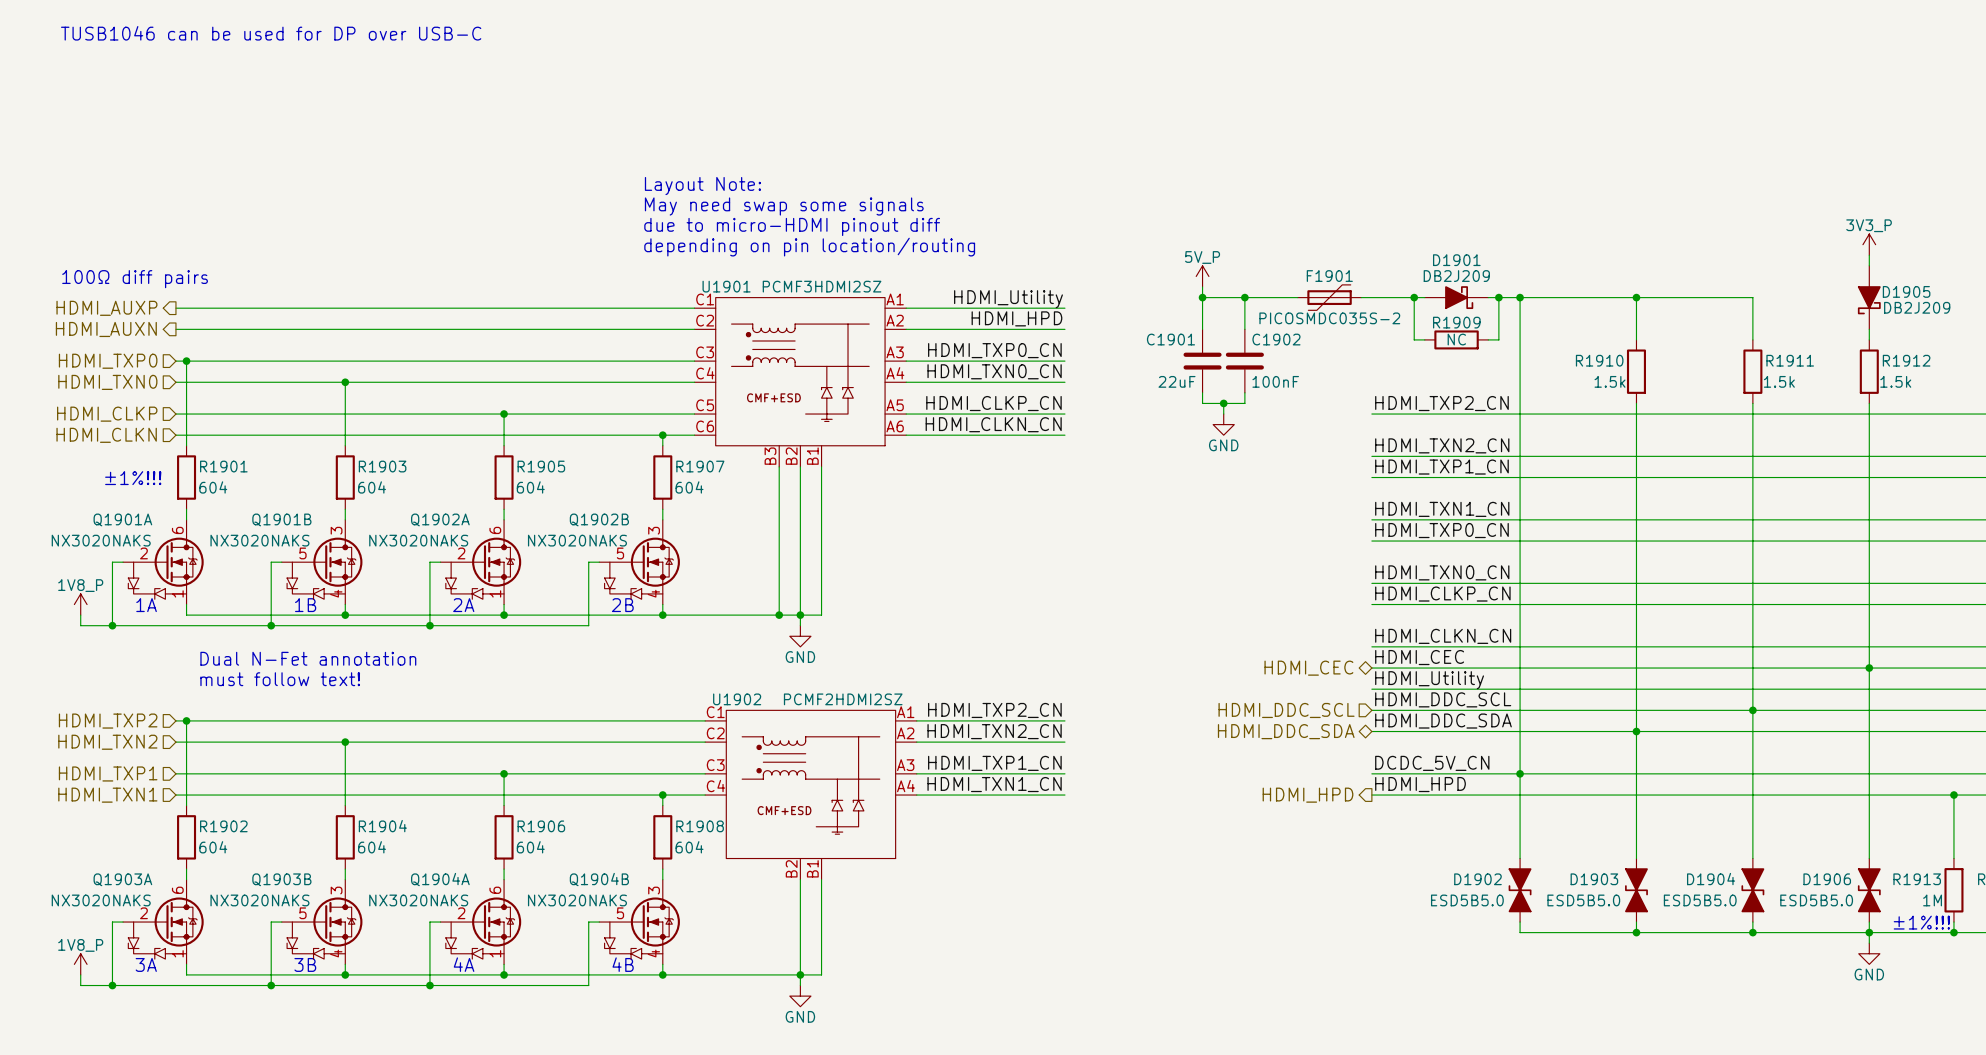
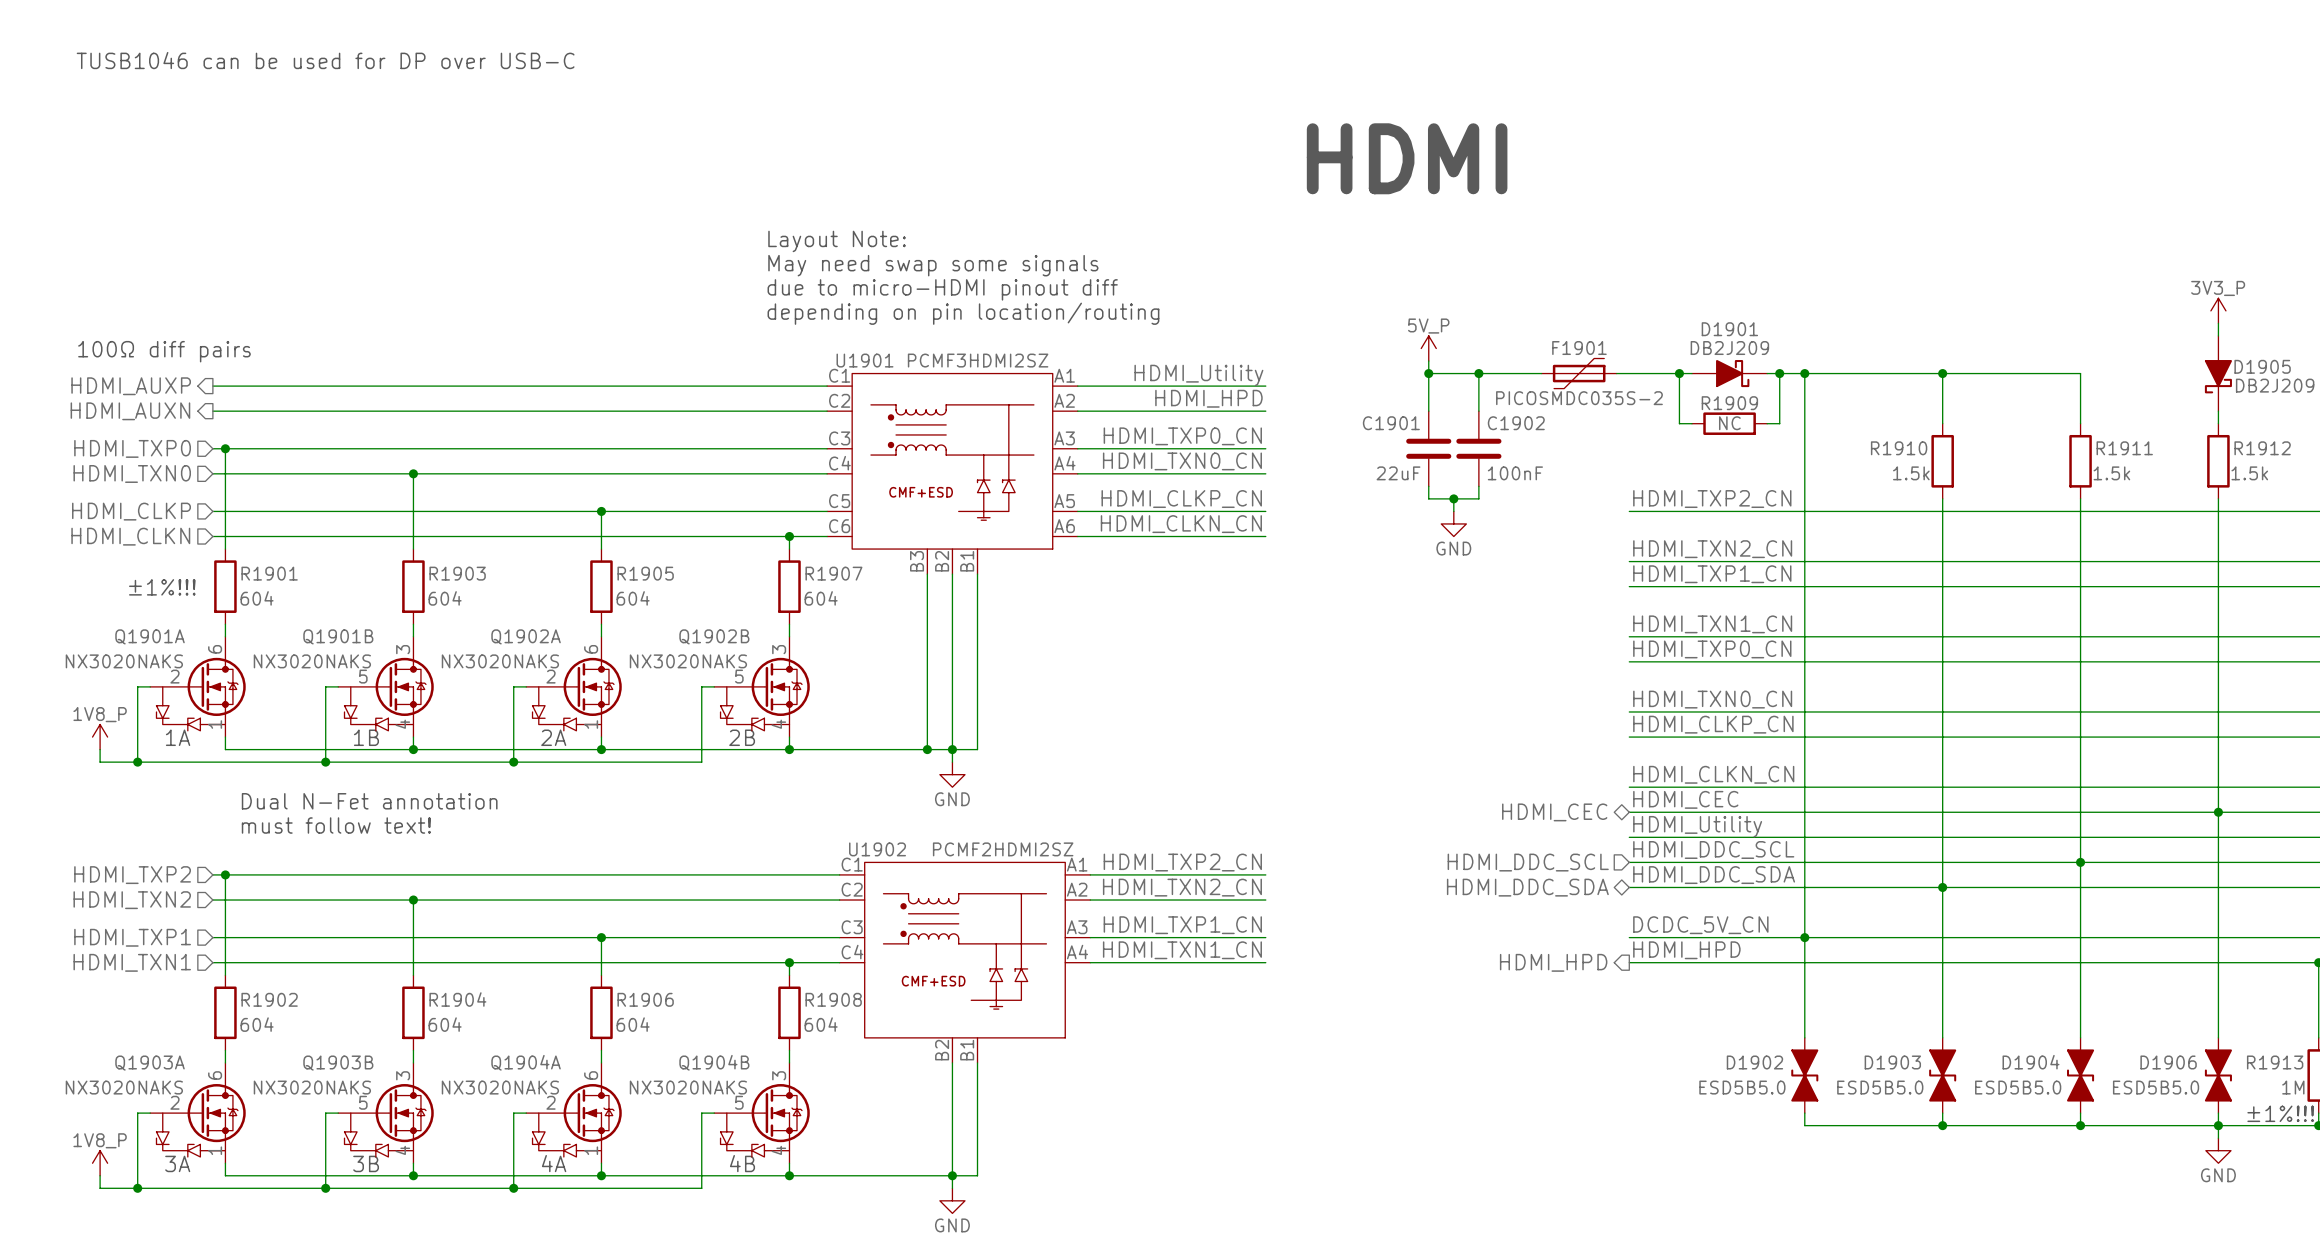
text: none -> HDMI (1407, 158)

